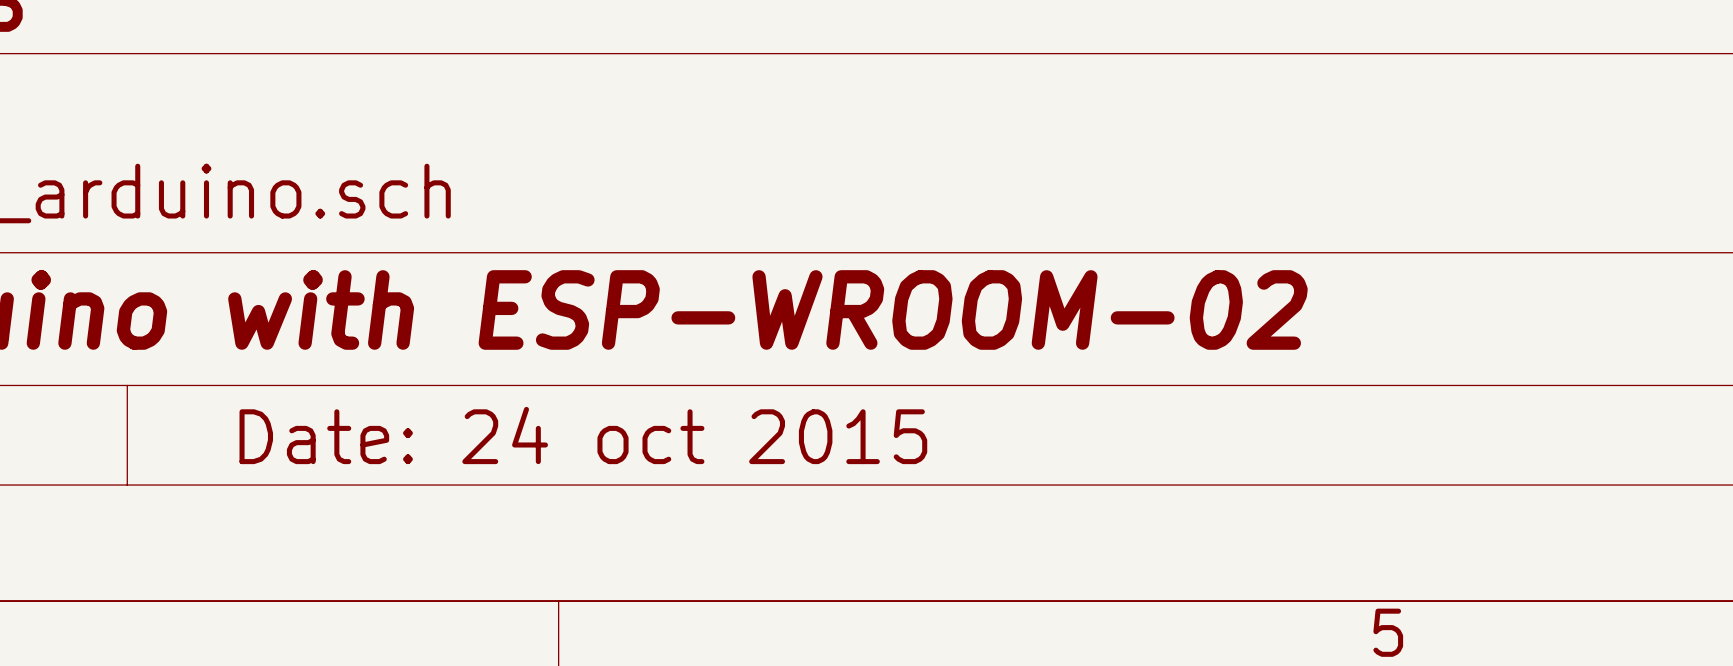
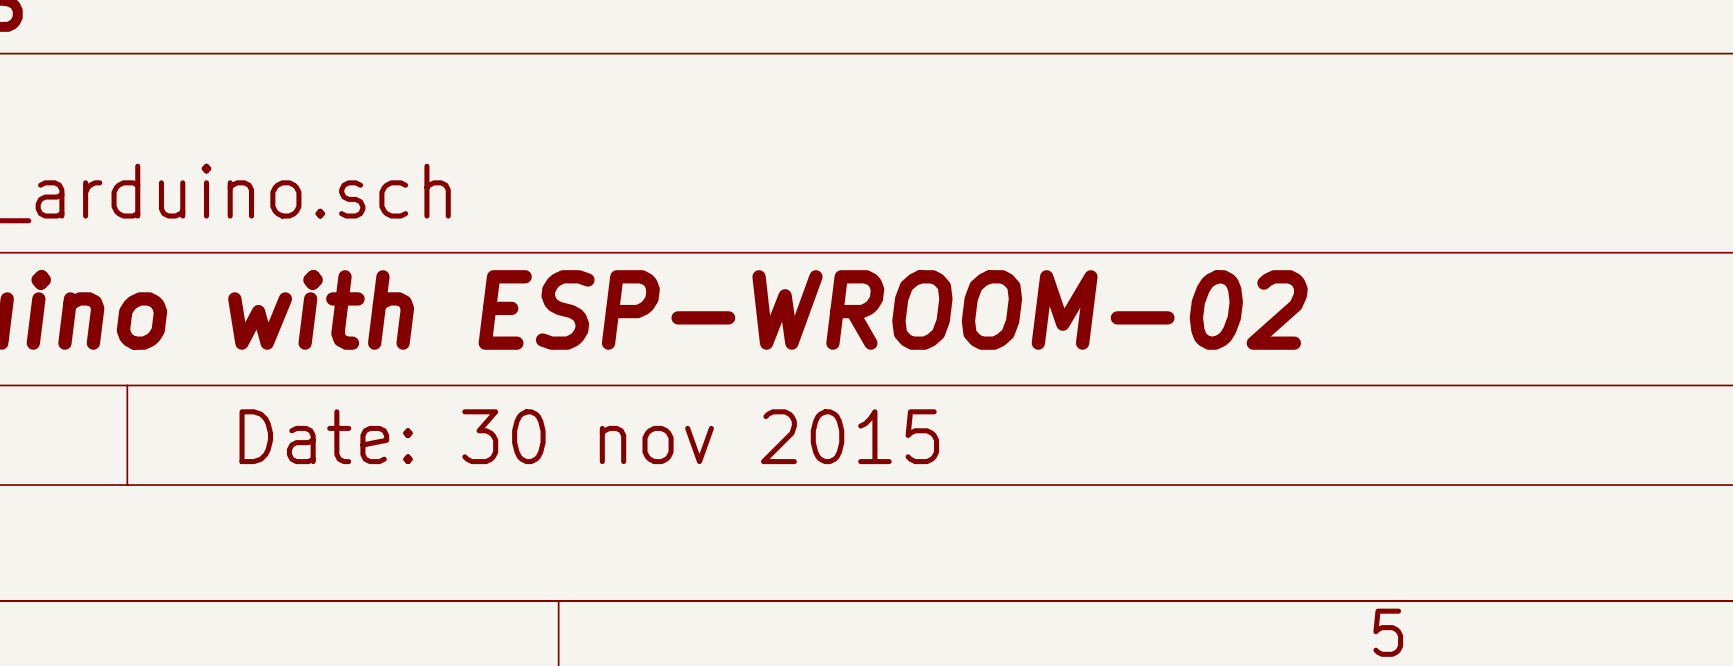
title block: Date: 24 oct 2015 (583, 435) -> Date: 30 nov 2015 (589, 436)

